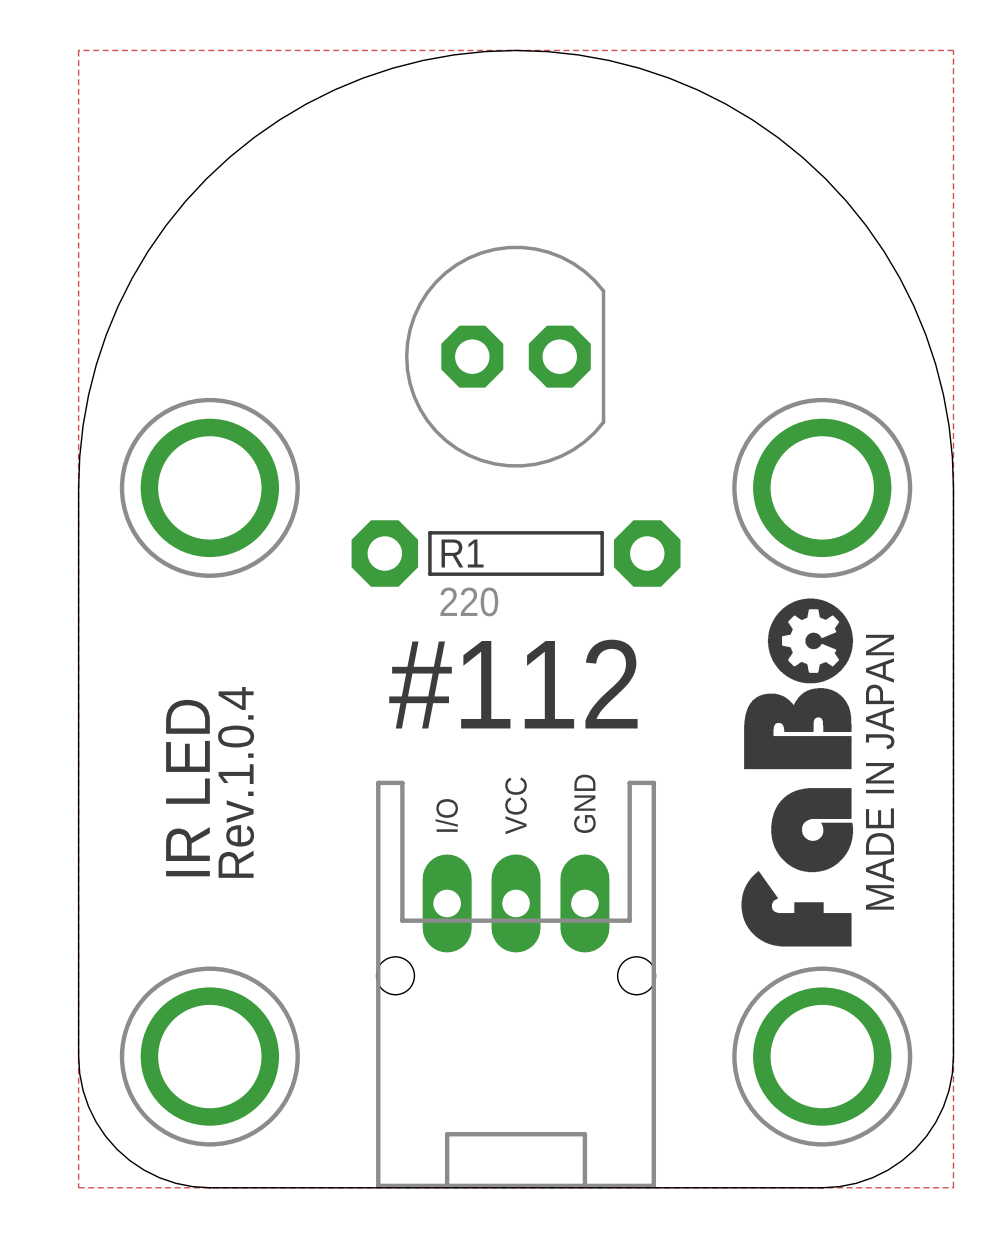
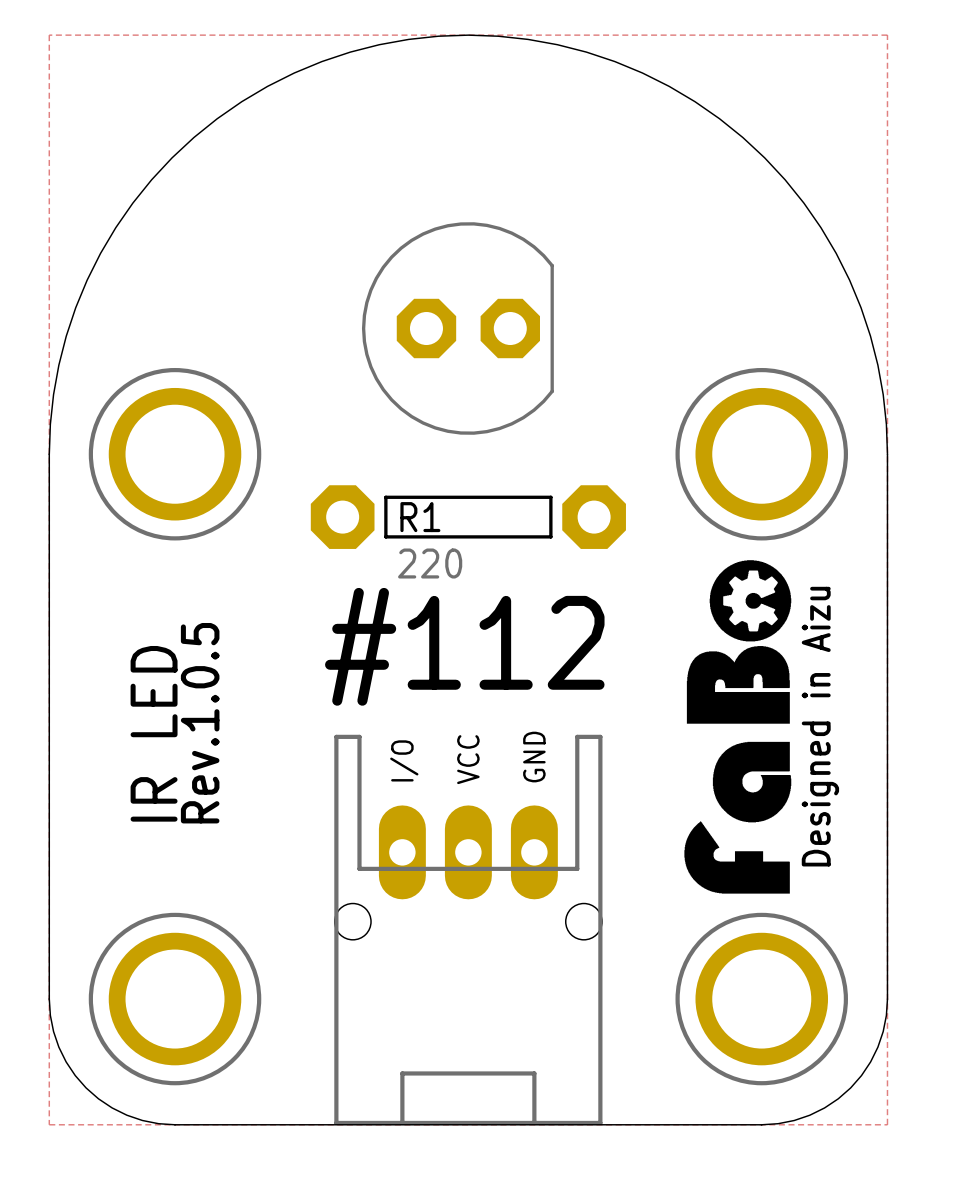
text: MADE IN JAPAN (880, 772) -> Designed in Aizu (820, 726)
text: Rev.1.0.4 (236, 782) -> Rev.1.0.5 (200, 723)

